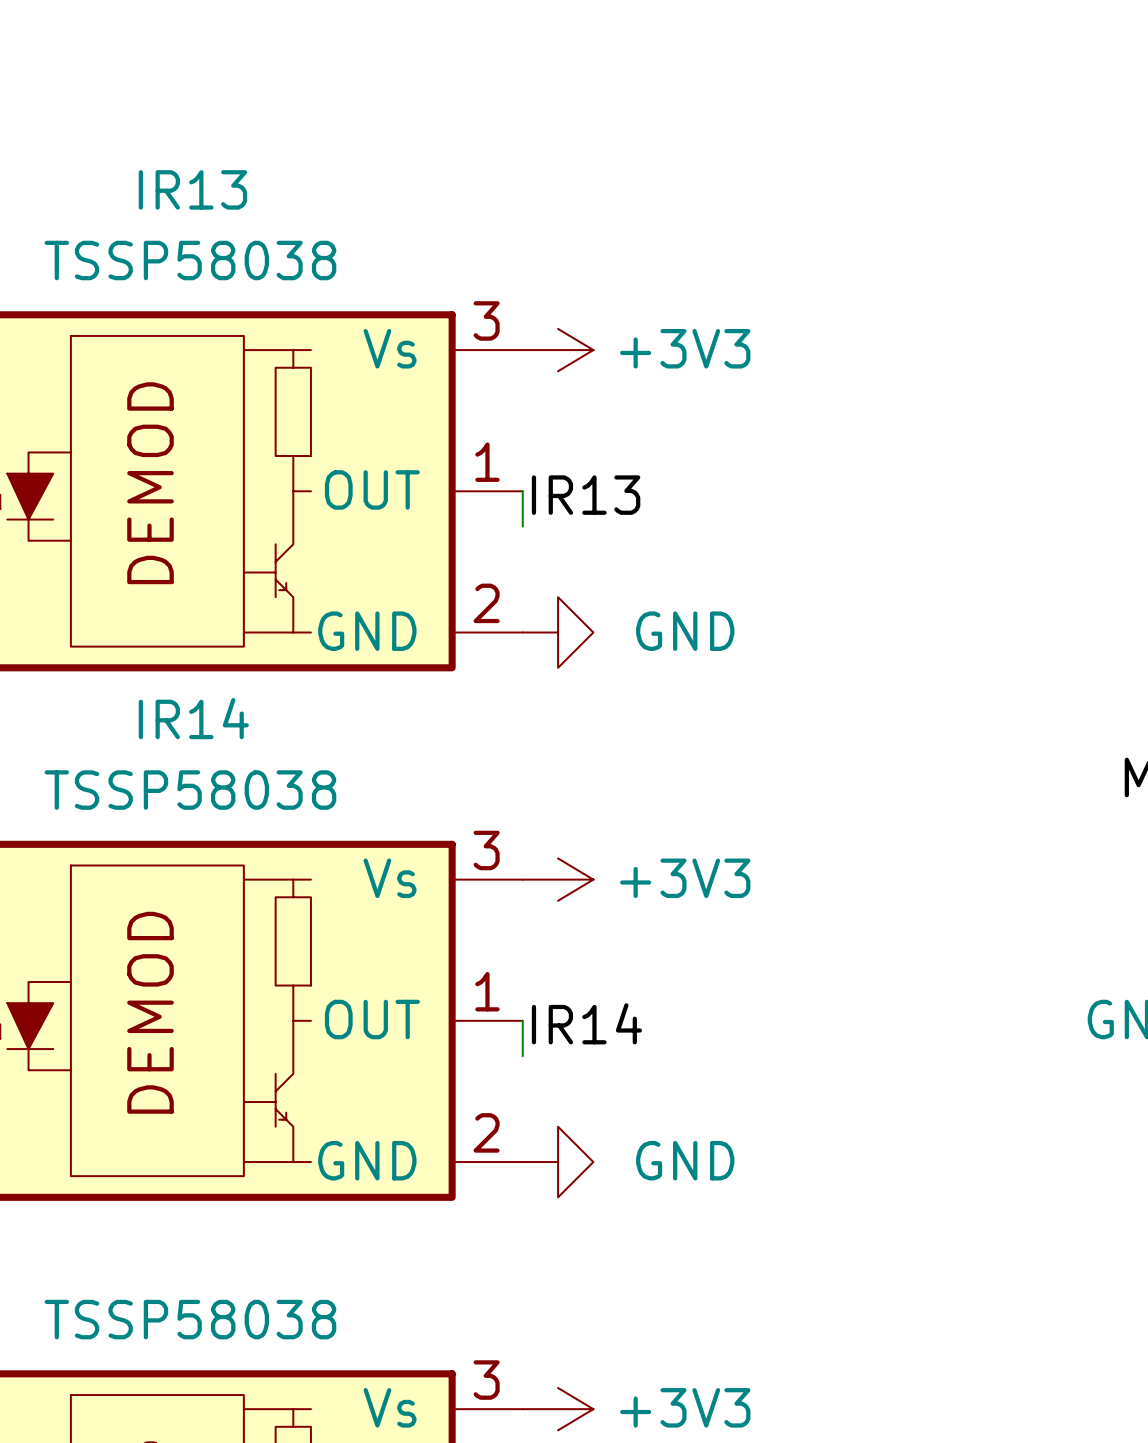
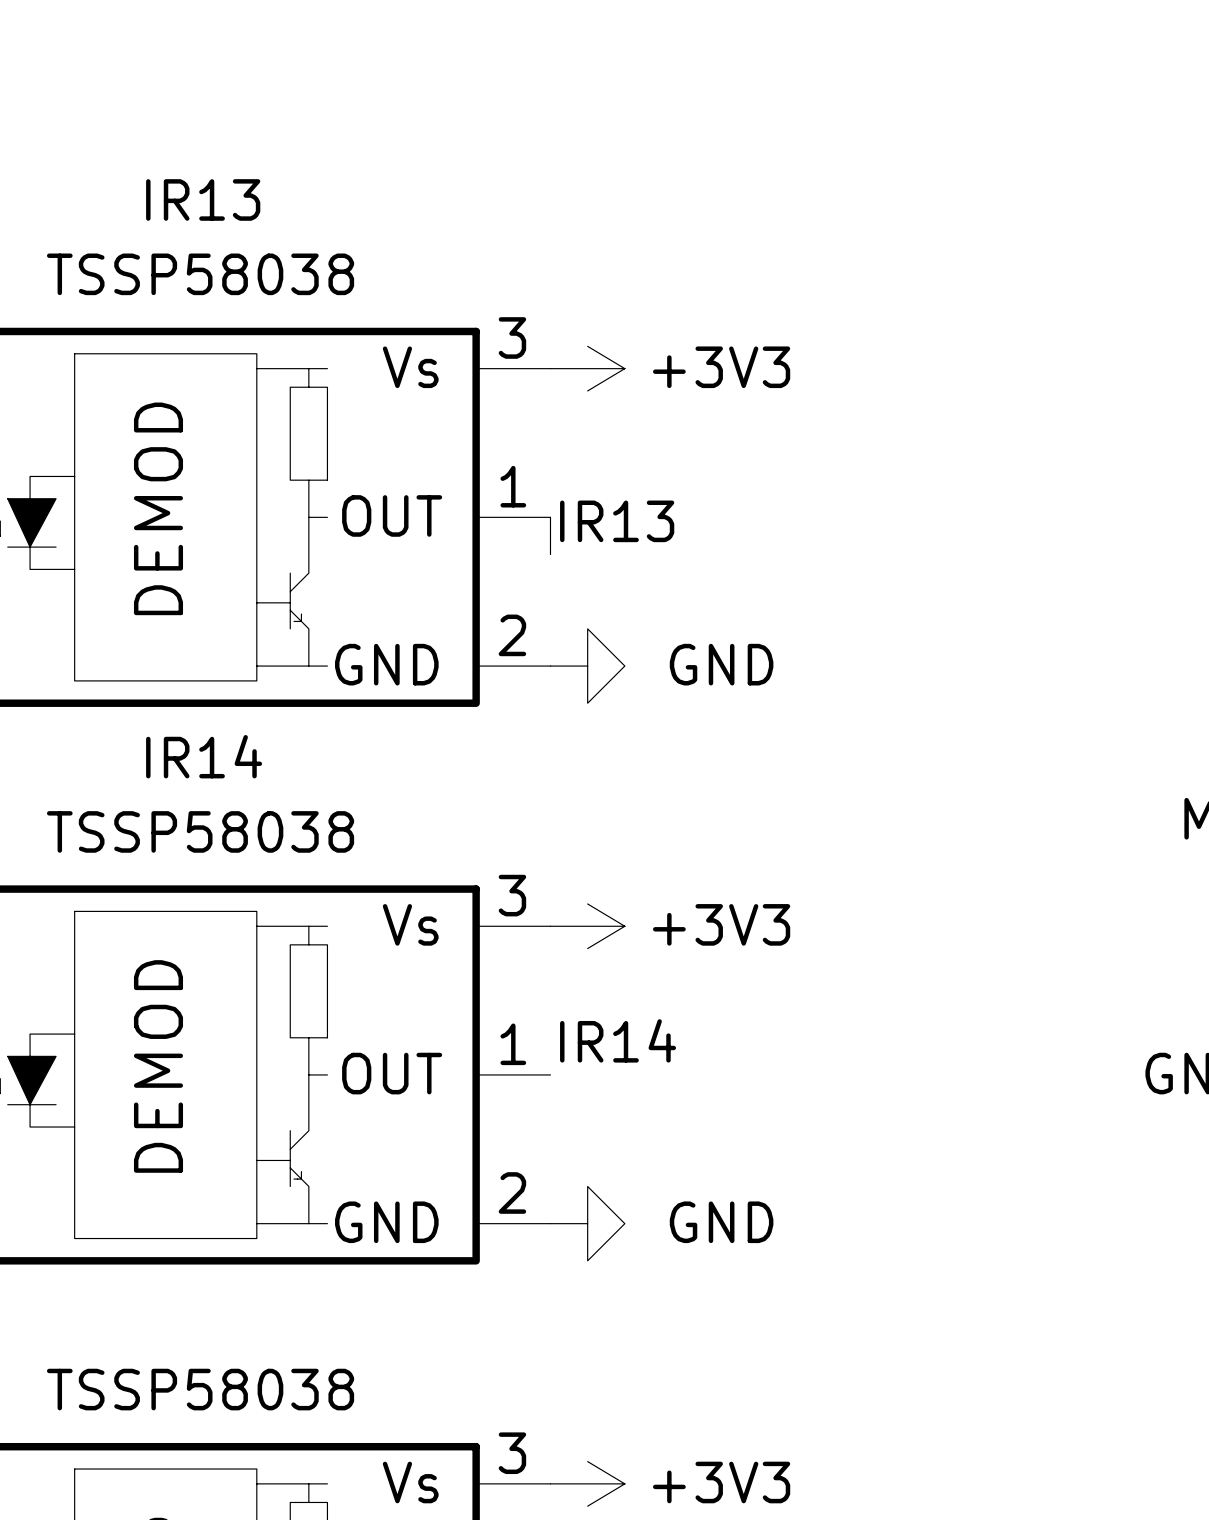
wire: (522, 1020) (522, 1056) -> none
label position: IR14 (586, 1023) -> IR14 (618, 1040)

